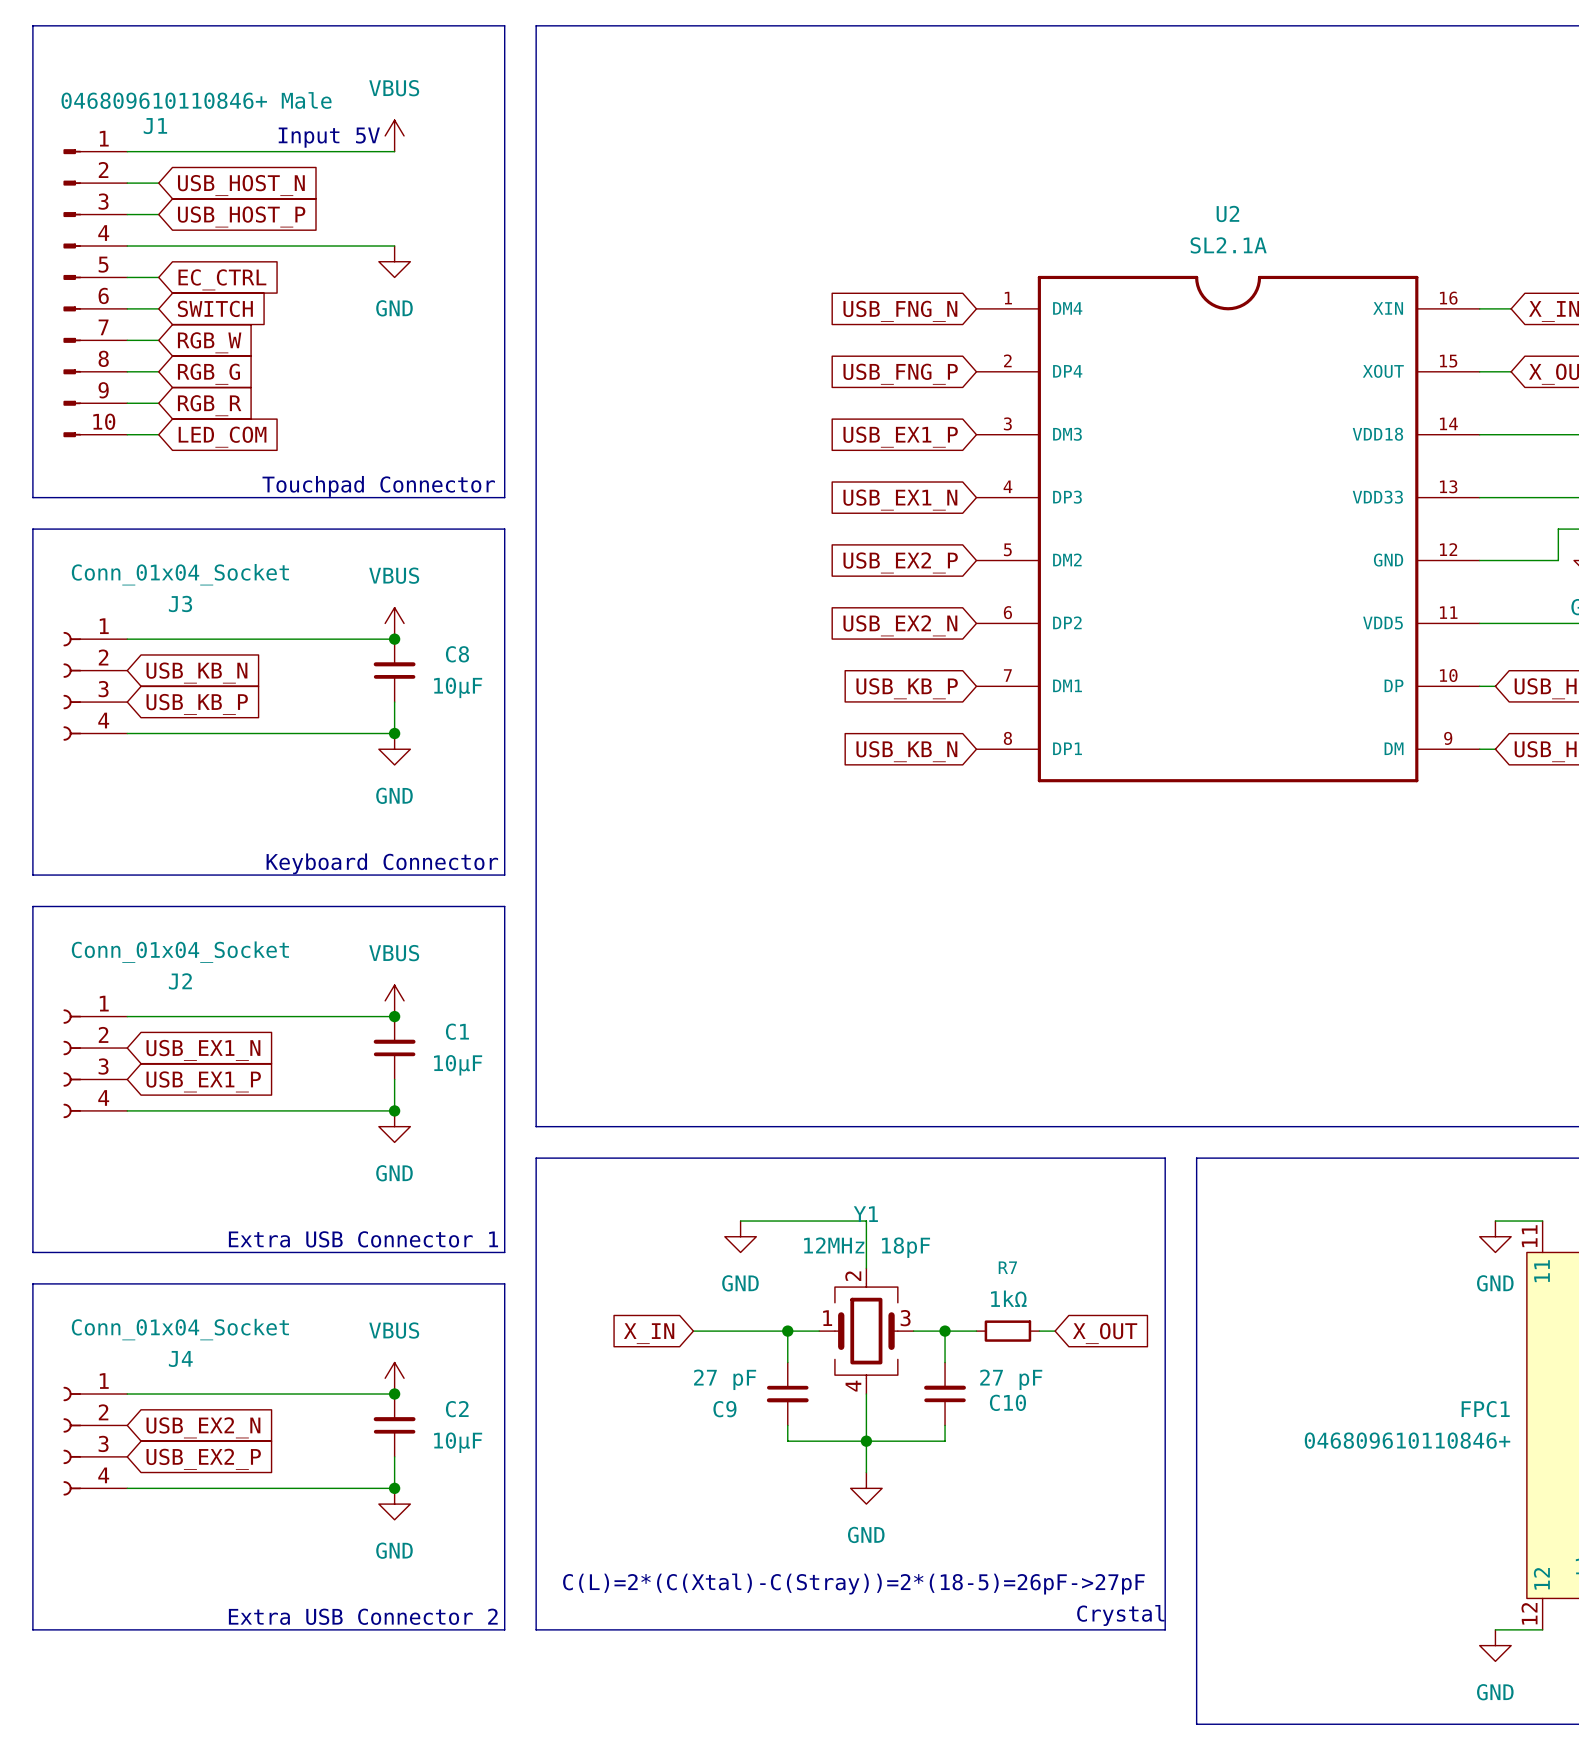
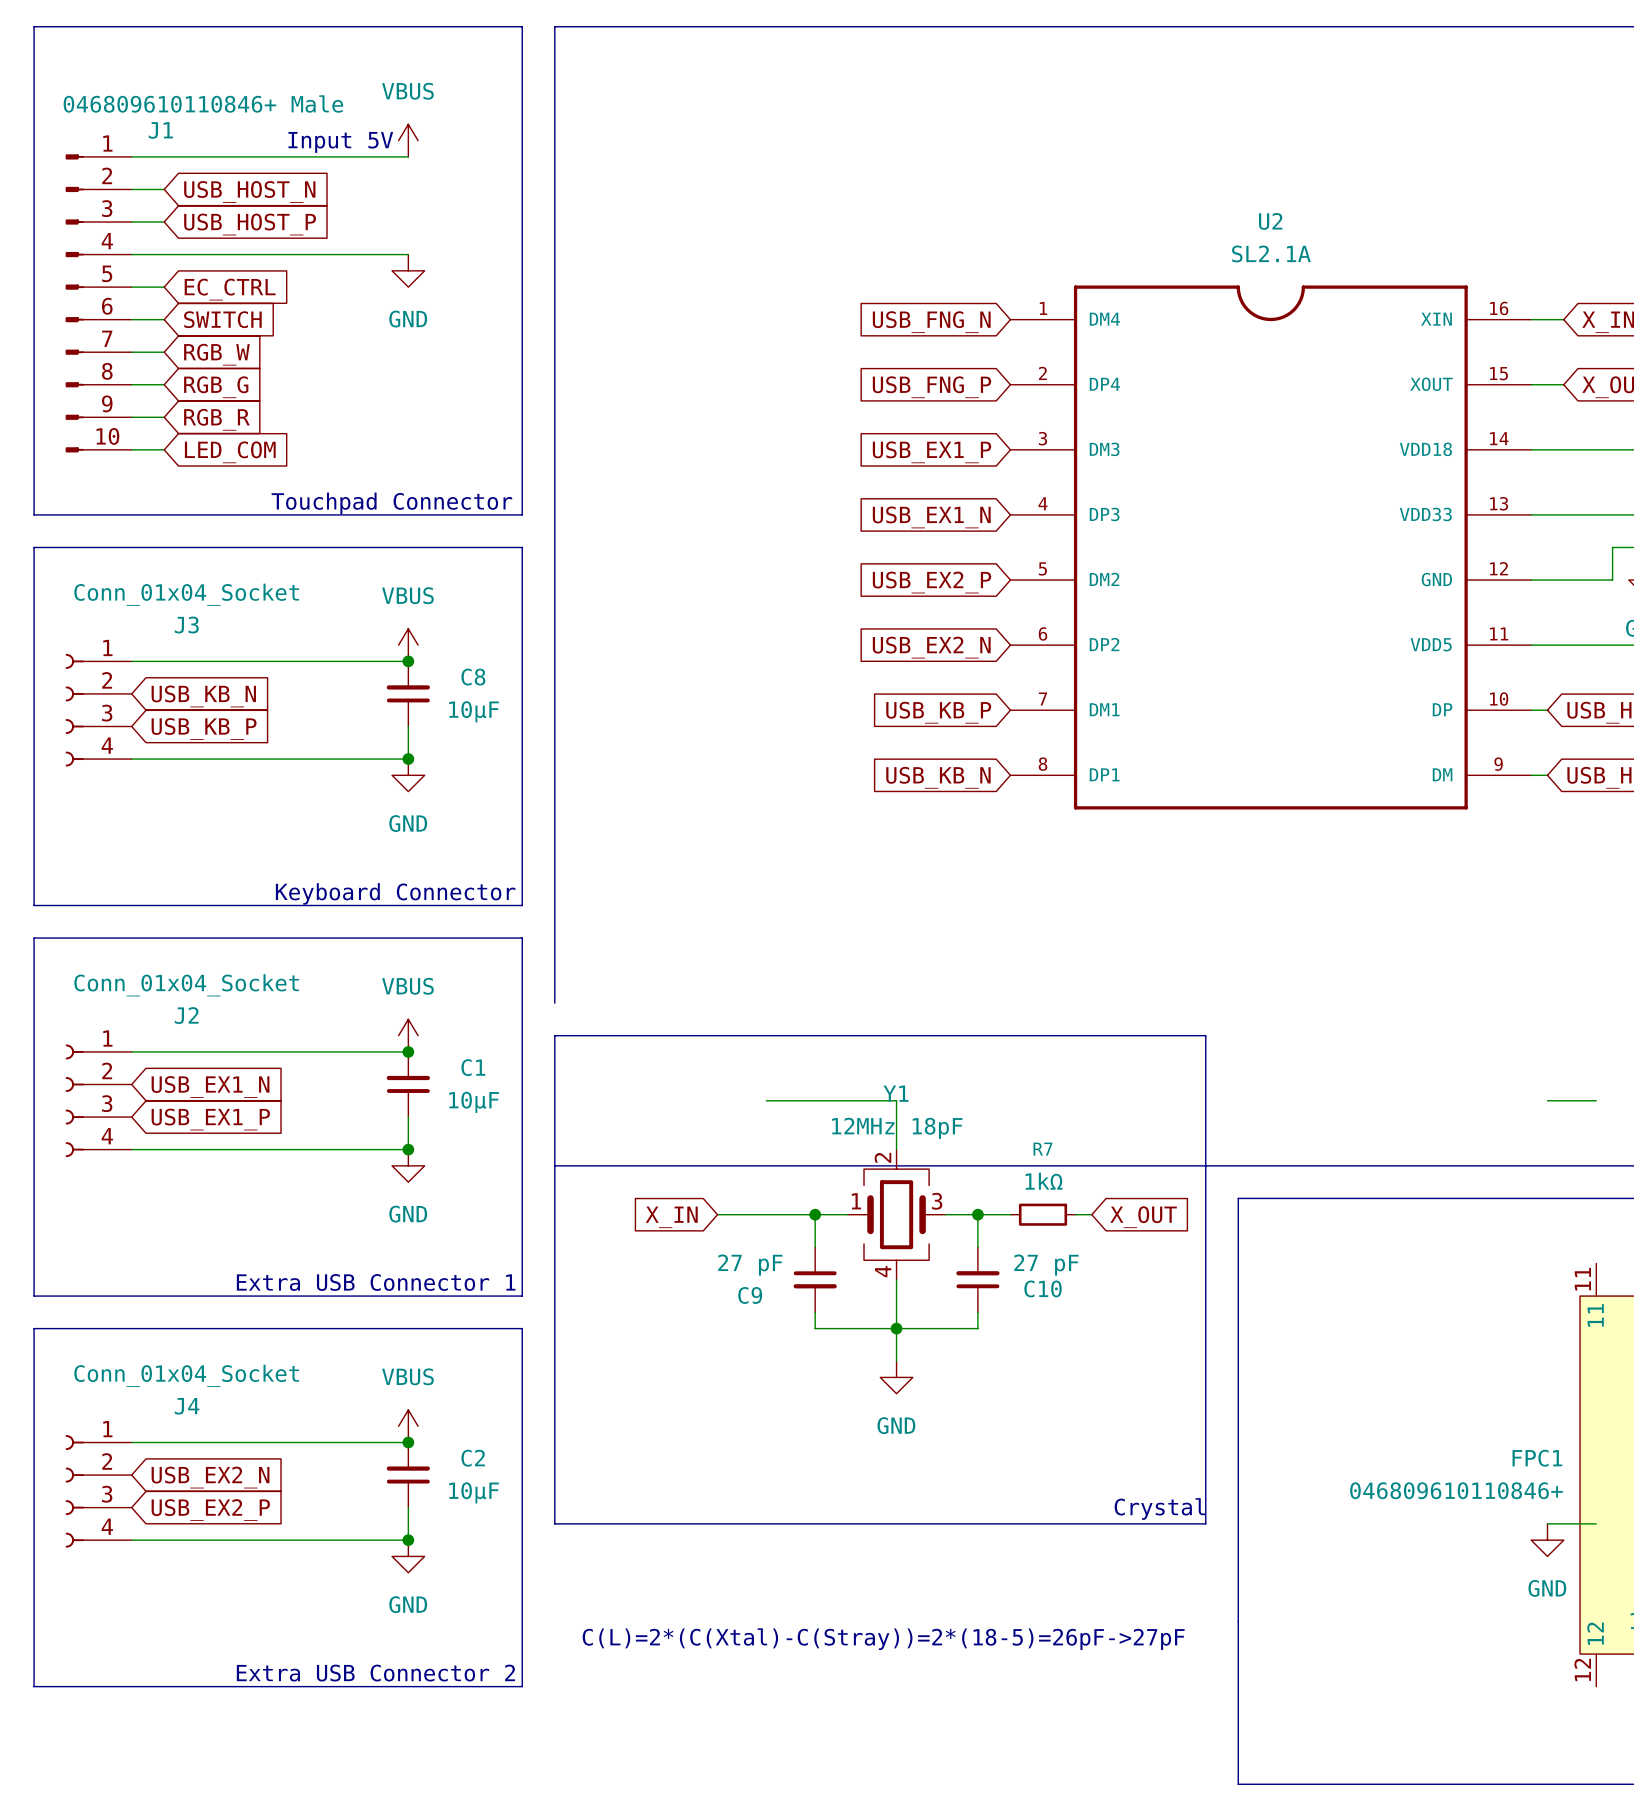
line: (536, 969) (536, 1000) -> (554, 1165) (554, 1198)
wire: none -> (766, 1100) (896, 1100) (896, 1149)
line: (536, 1158) (1165, 1158) -> (554, 1035) (1205, 1035) (1205, 1198)
junction: none -> (815, 1214)
junction: none -> (977, 1214)
wire: (740, 1221) (866, 1221) (866, 1236) -> none
wire: (1495, 1221) (1542, 1221) -> (1547, 1100) (1596, 1100)
power symbol: GND (740, 1236) -> none
power symbol: GND (1495, 1236) -> none
wire: none -> (896, 1312) (896, 1361)
junction: none -> (896, 1328)
wire: (693, 1331) (819, 1331) -> (717, 1214) (847, 1214)
wire: (787, 1331) (787, 1362) -> (815, 1214) (815, 1247)
junction: (787, 1331) -> none
Y1 position: (866, 1331) -> (896, 1214)
power symbol: none -> GND (896, 1377)
wire: (913, 1331) (976, 1331) -> (945, 1214) (1010, 1214)
wire: (945, 1331) (945, 1362) -> (977, 1214) (977, 1247)
junction: (945, 1331) -> none
R7 position: (1007, 1331) -> (1043, 1214)
wire: (1039, 1331) (1055, 1331) -> (1075, 1214) (1091, 1214)
global label position: X_IN (649, 1333) -> X_IN (671, 1217)
global label position: X_OUT (1105, 1333) -> X_OUT (1143, 1217)
C9 position: (787, 1394) -> (815, 1279)
wire: (866, 1394) (866, 1472) -> none
C10 position: (945, 1394) -> (977, 1279)
wire: (787, 1425) (787, 1441) (945, 1441) (945, 1425) -> (815, 1312) (815, 1328) (977, 1328) (977, 1312)
junction: (866, 1441) -> none
line: (536, 1472) (536, 1629) (1165, 1629) (1165, 1472) -> (554, 1523) (1205, 1523)
power symbol: GND (866, 1488) -> none
power symbol: none -> GND (1547, 1540)
text position: Crystal (1120, 1615) -> Crystal (1159, 1508)
wire: (1495, 1629) (1542, 1629) -> (1547, 1523) (1596, 1523)
power symbol: GND (1495, 1645) -> none

